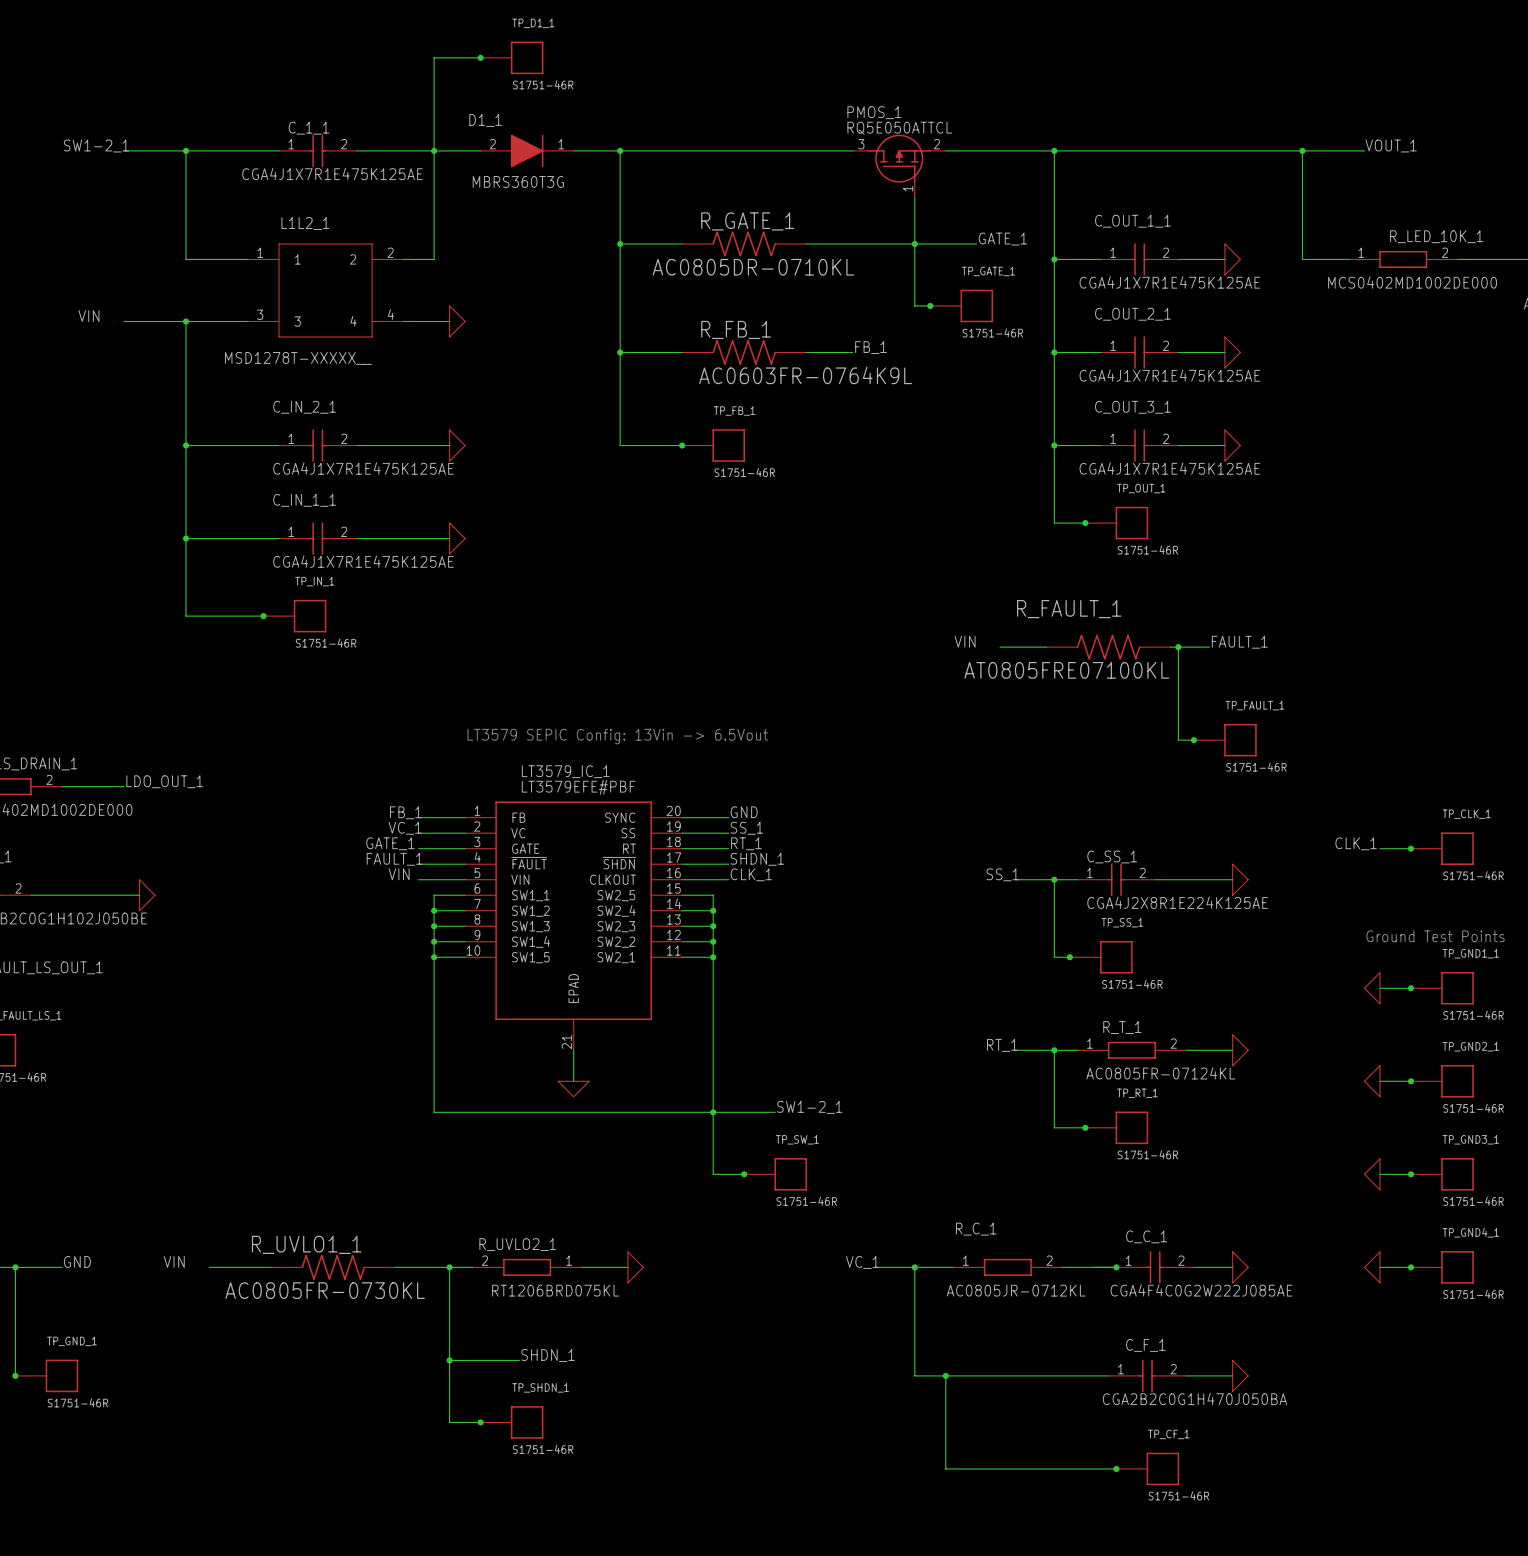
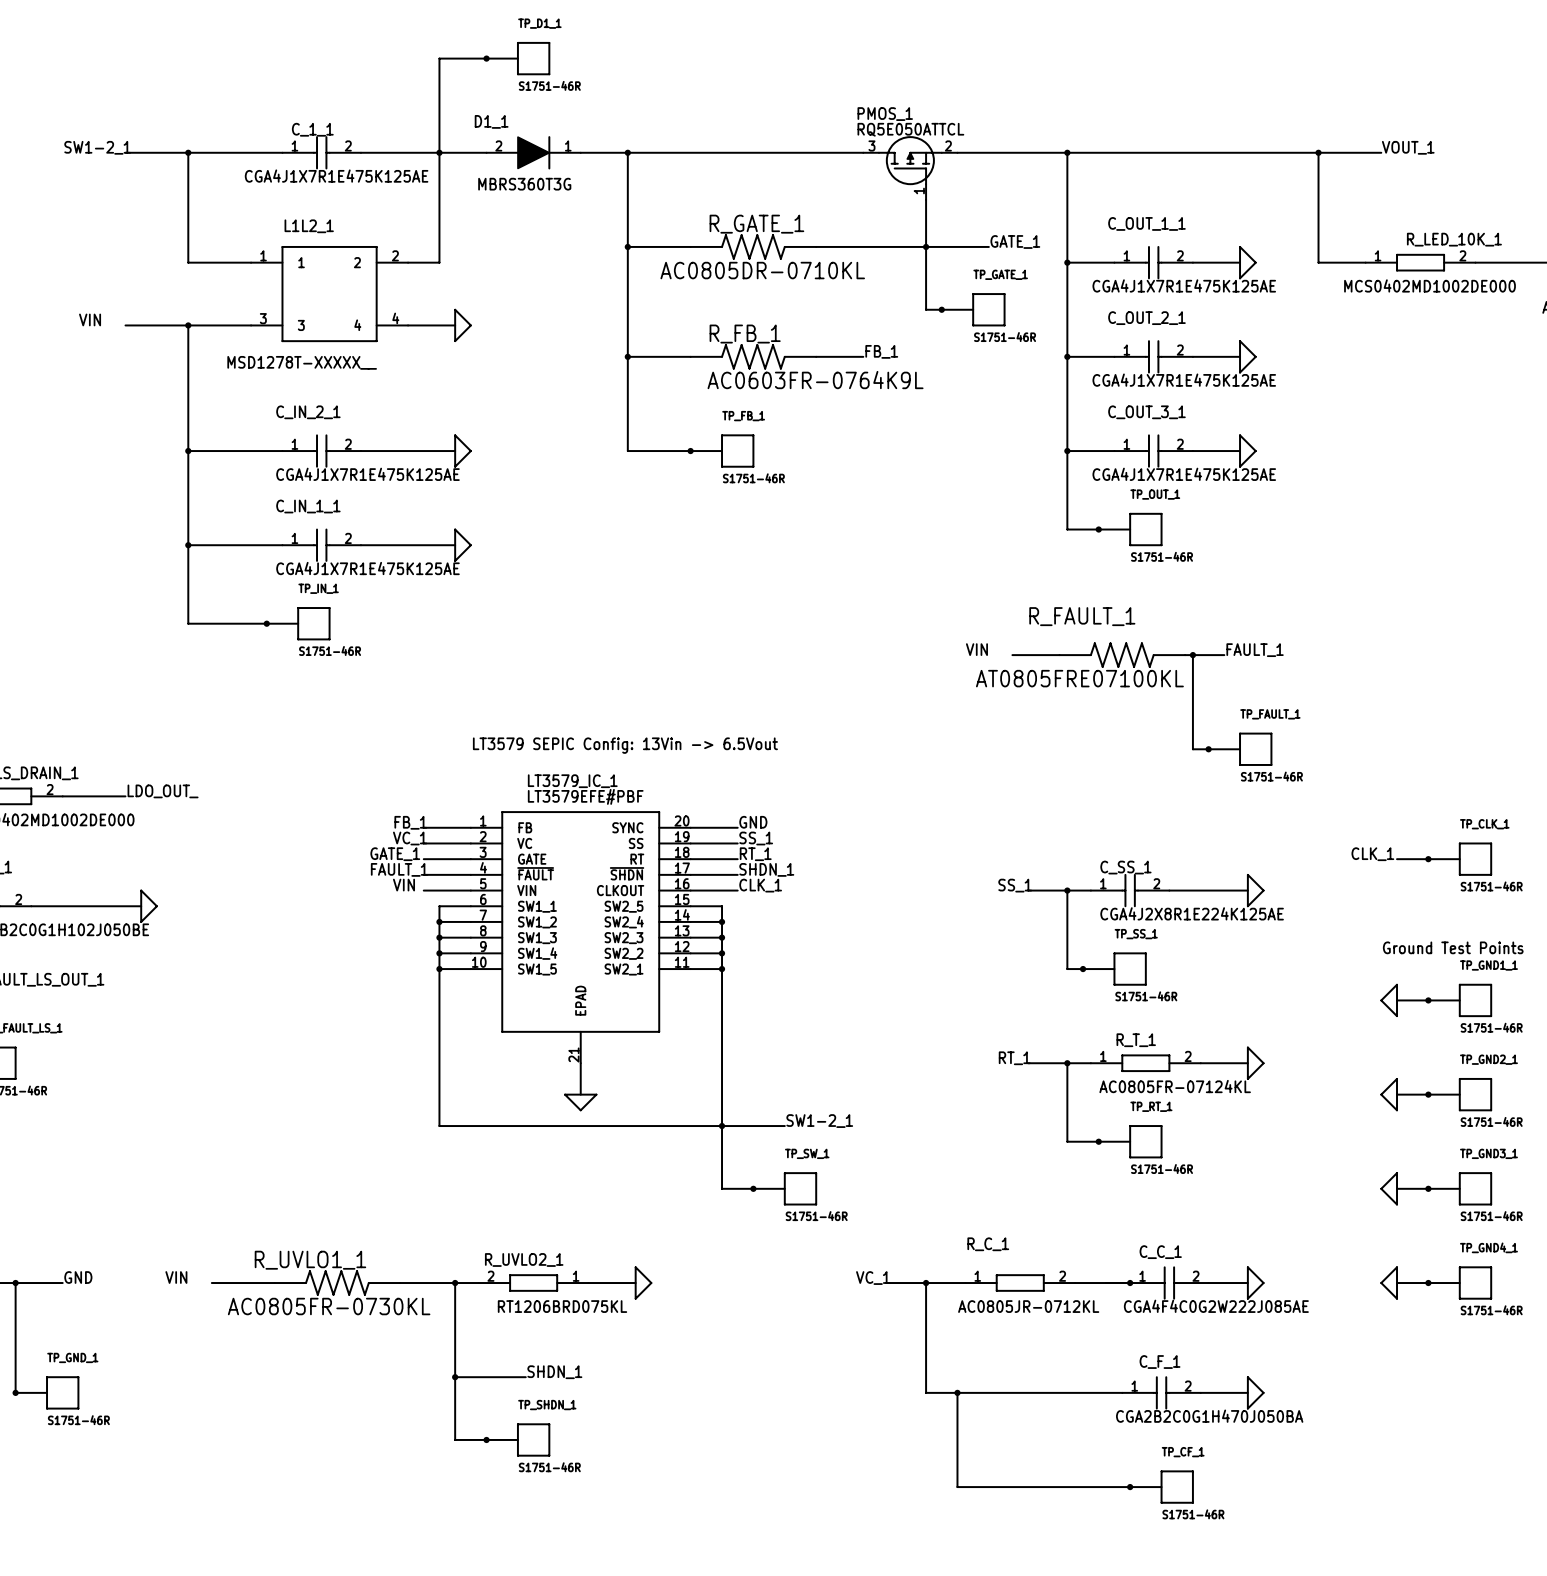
label: LDO_OUT_1 (164, 781) -> LDO_OUT_ (163, 791)

